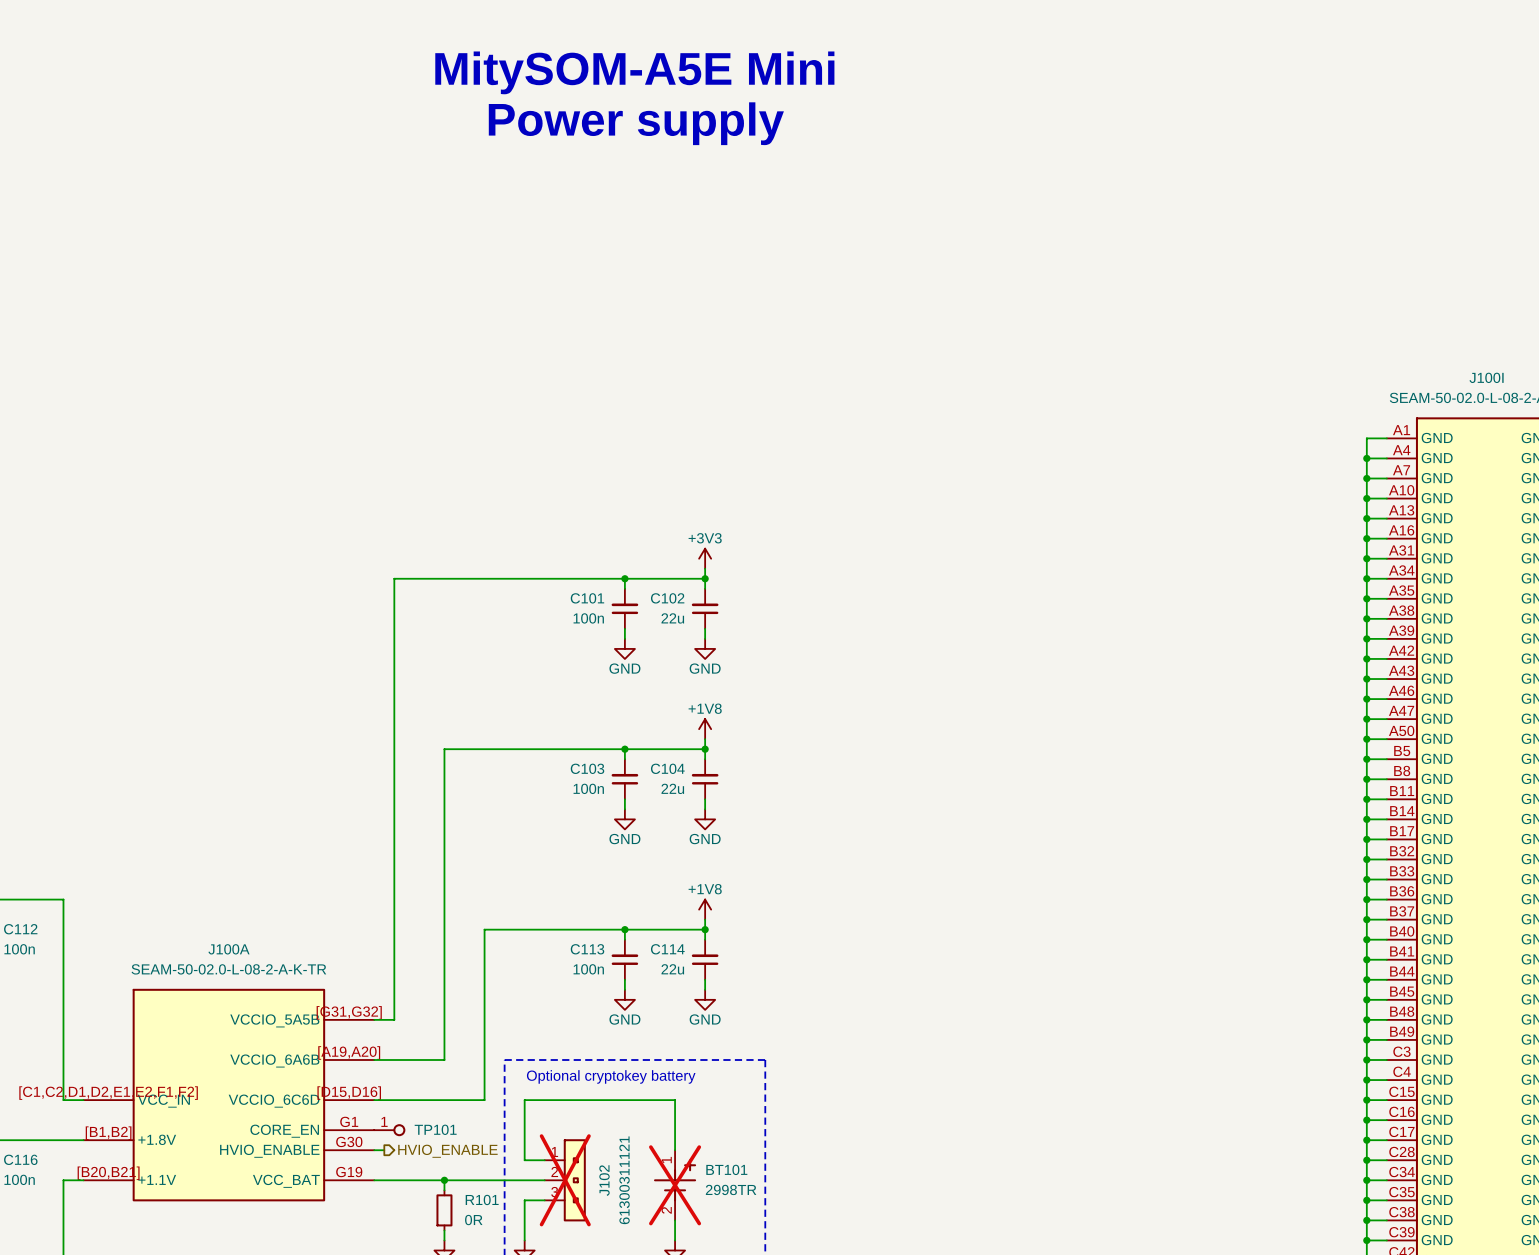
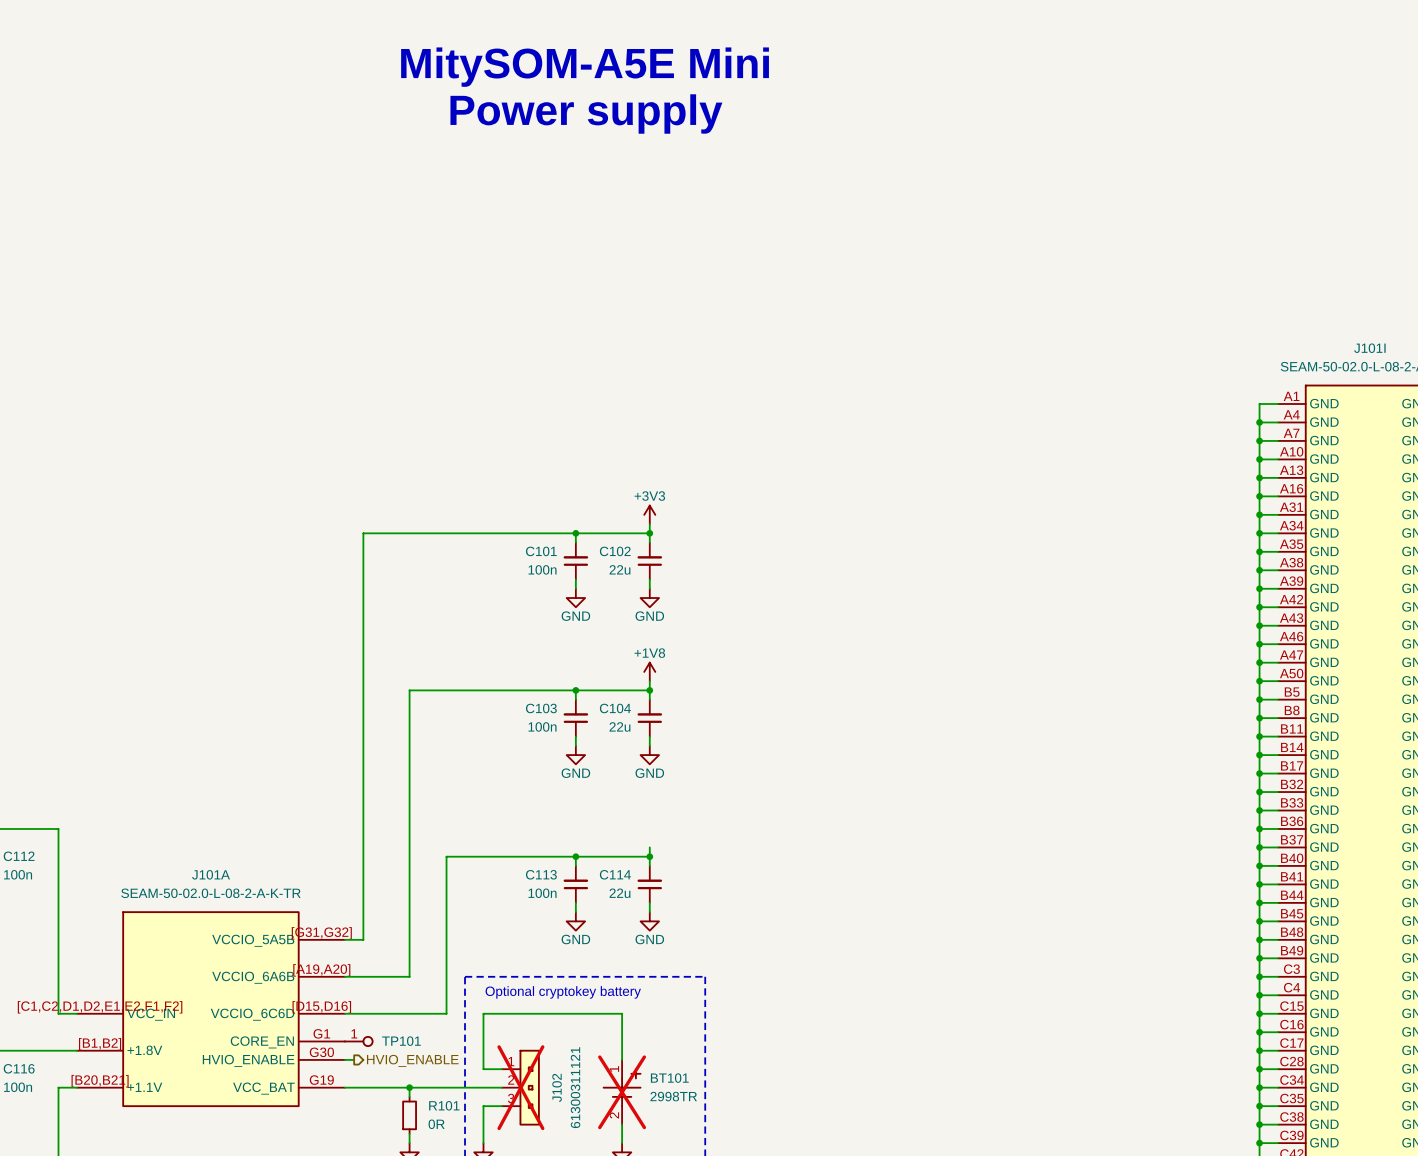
J100I name: J100I (1486, 377) -> J101I (1369, 348)
power symbol: +1V8 (705, 909) -> none
J100A name: J100A (229, 949) -> J101A (211, 874)

